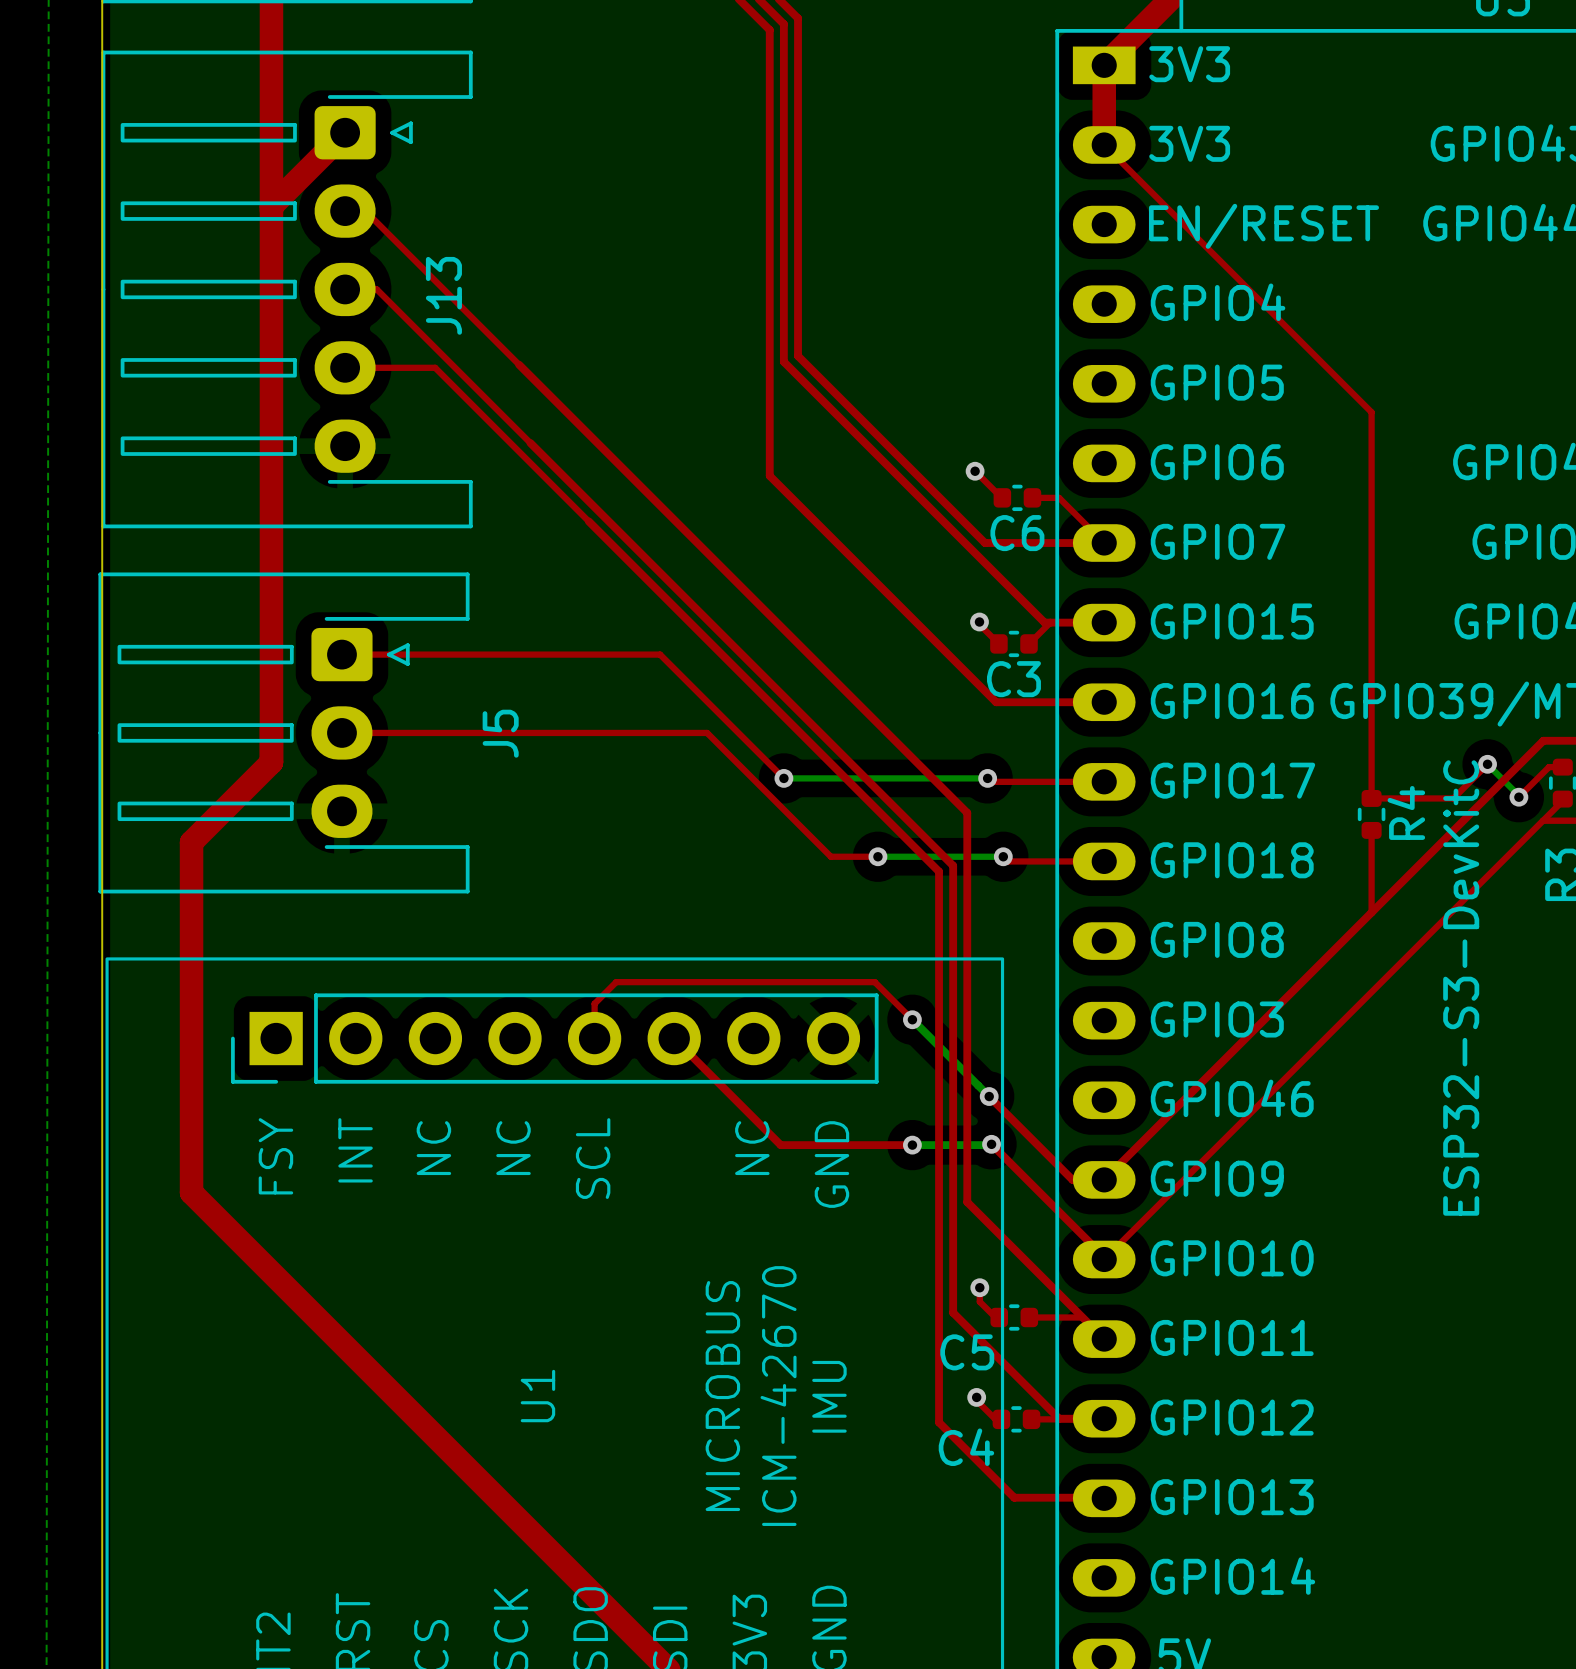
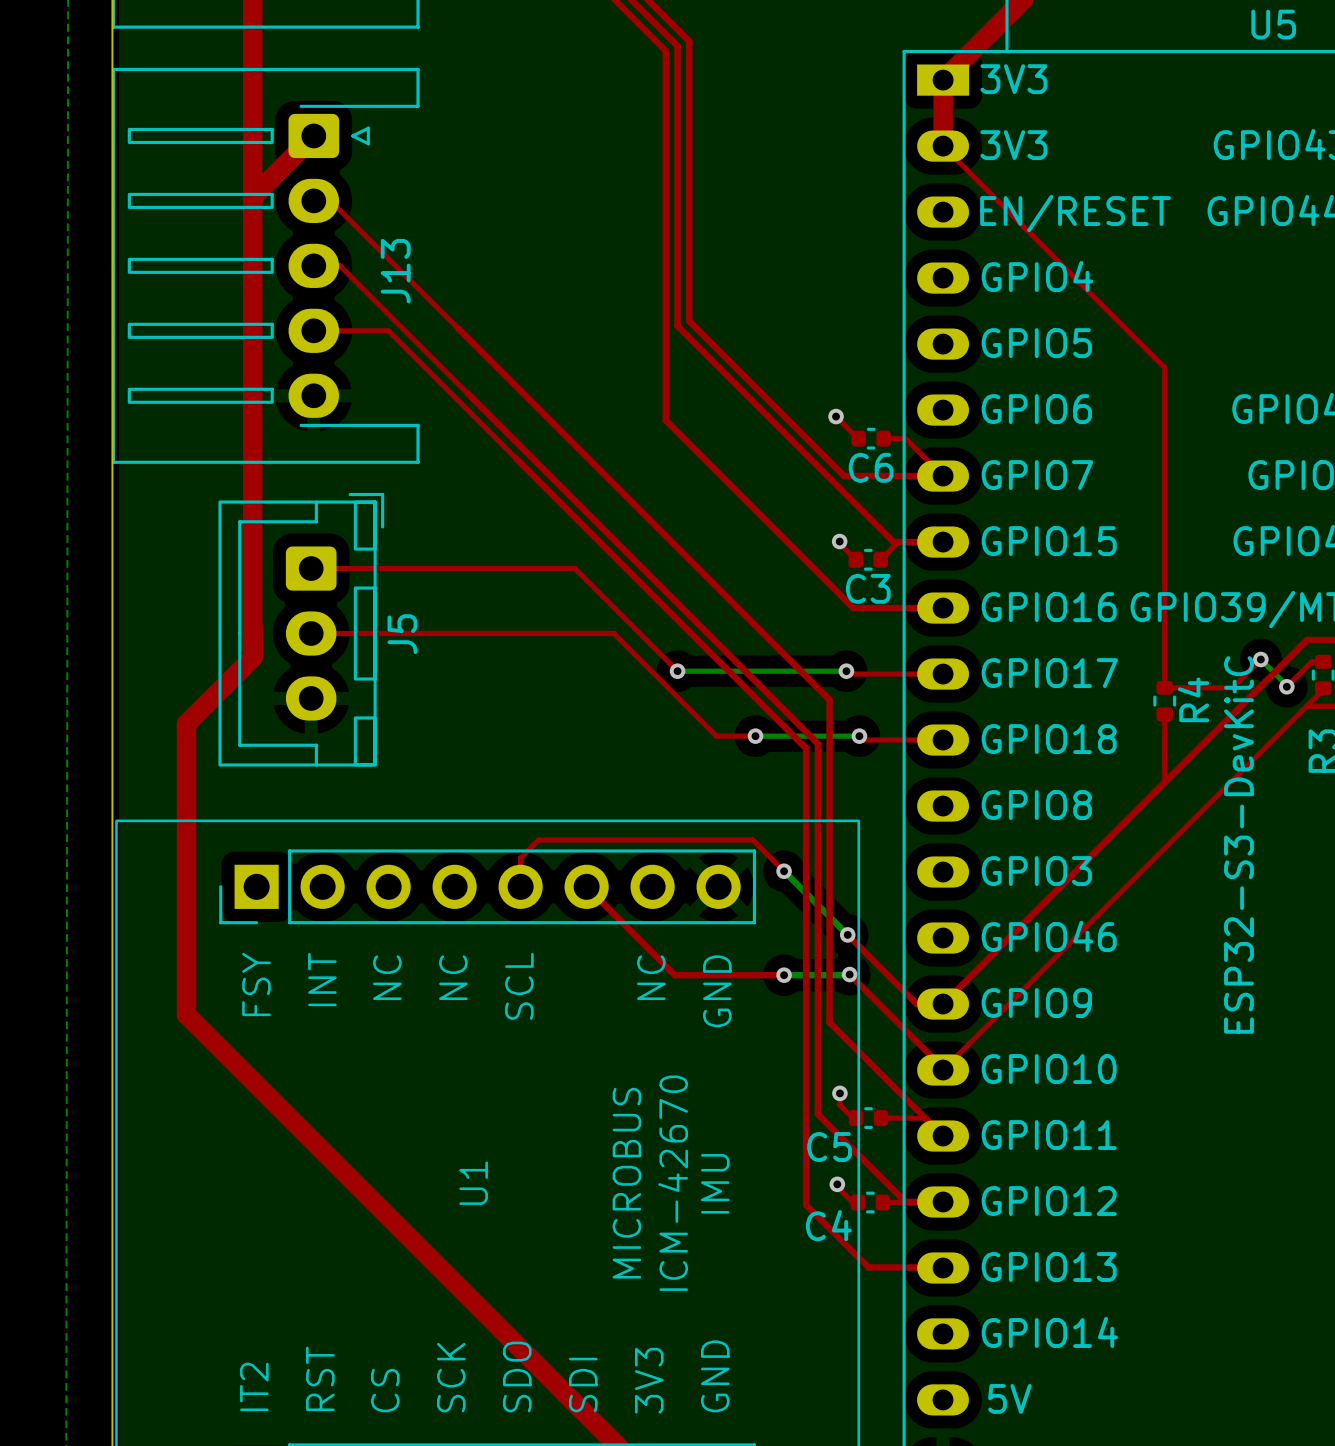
J5 footprint: [98, 572, 470, 894] -> [218, 492, 385, 767]
J5 name position: J5 (500, 733) -> J5 (402, 634)

